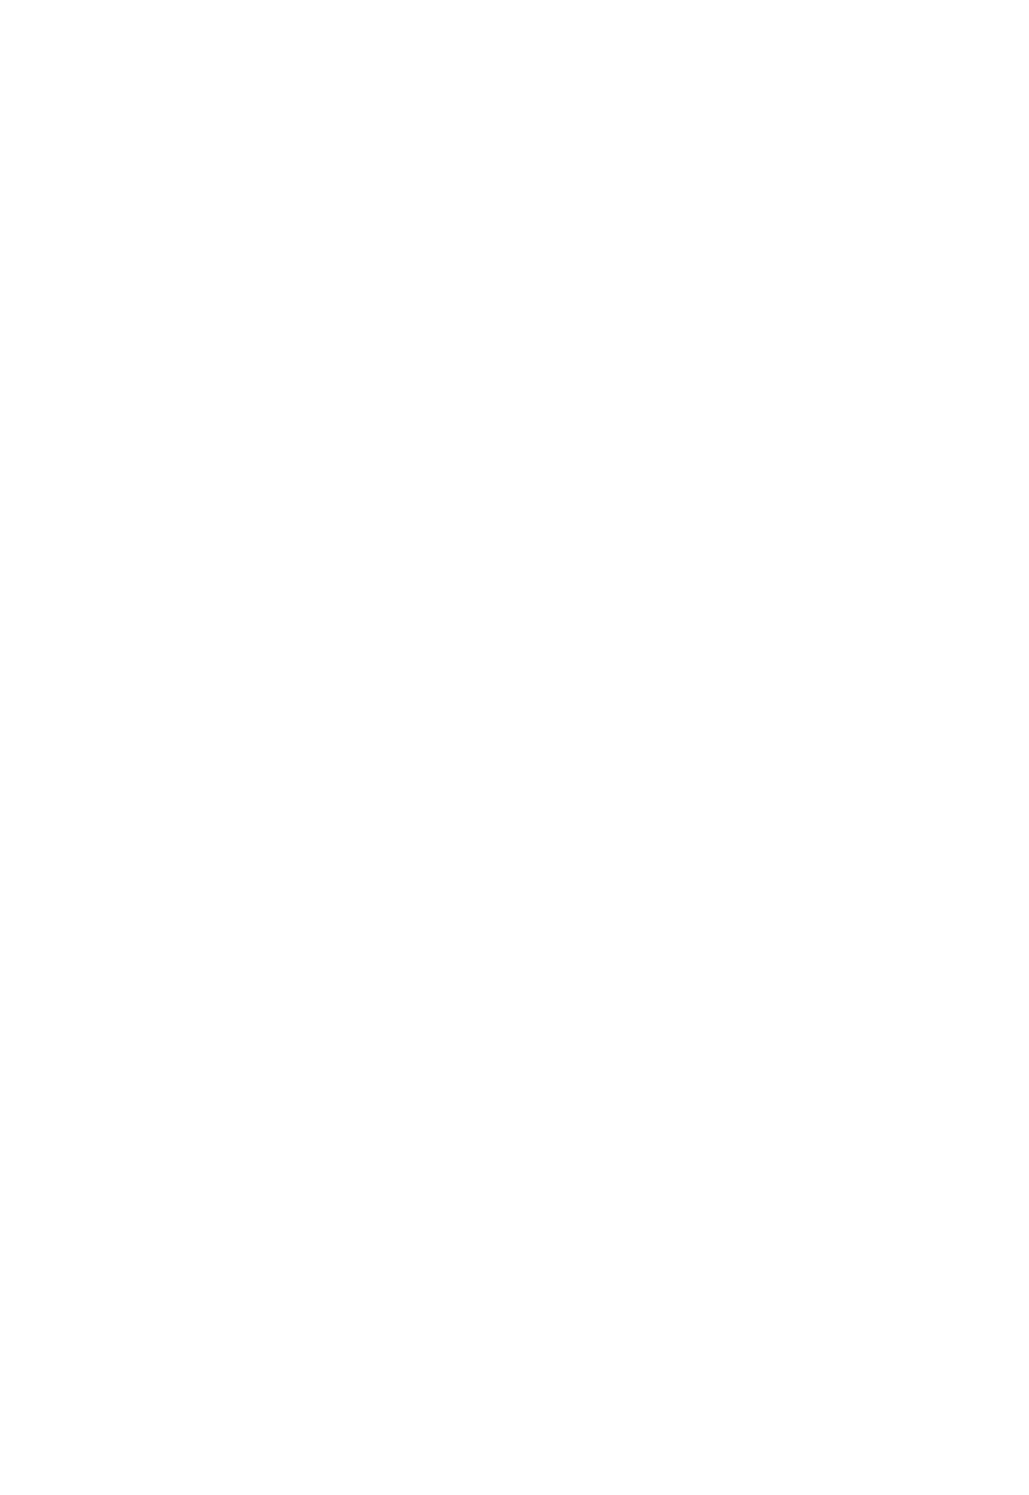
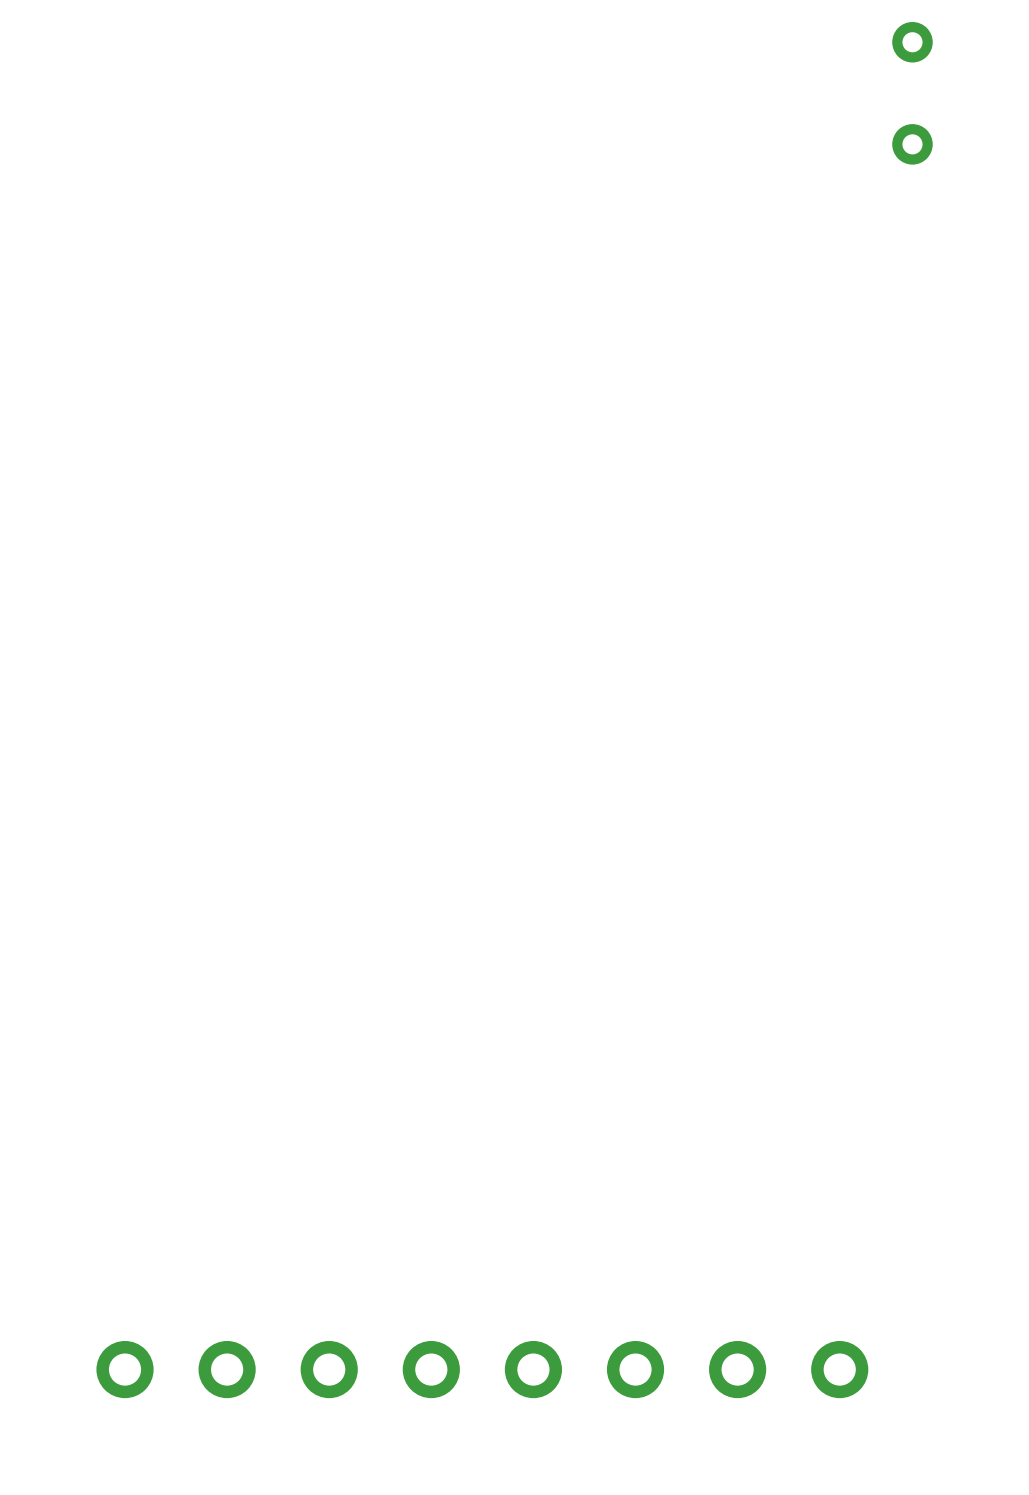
part: none -> (912, 93)
part: none -> (482, 1369)

